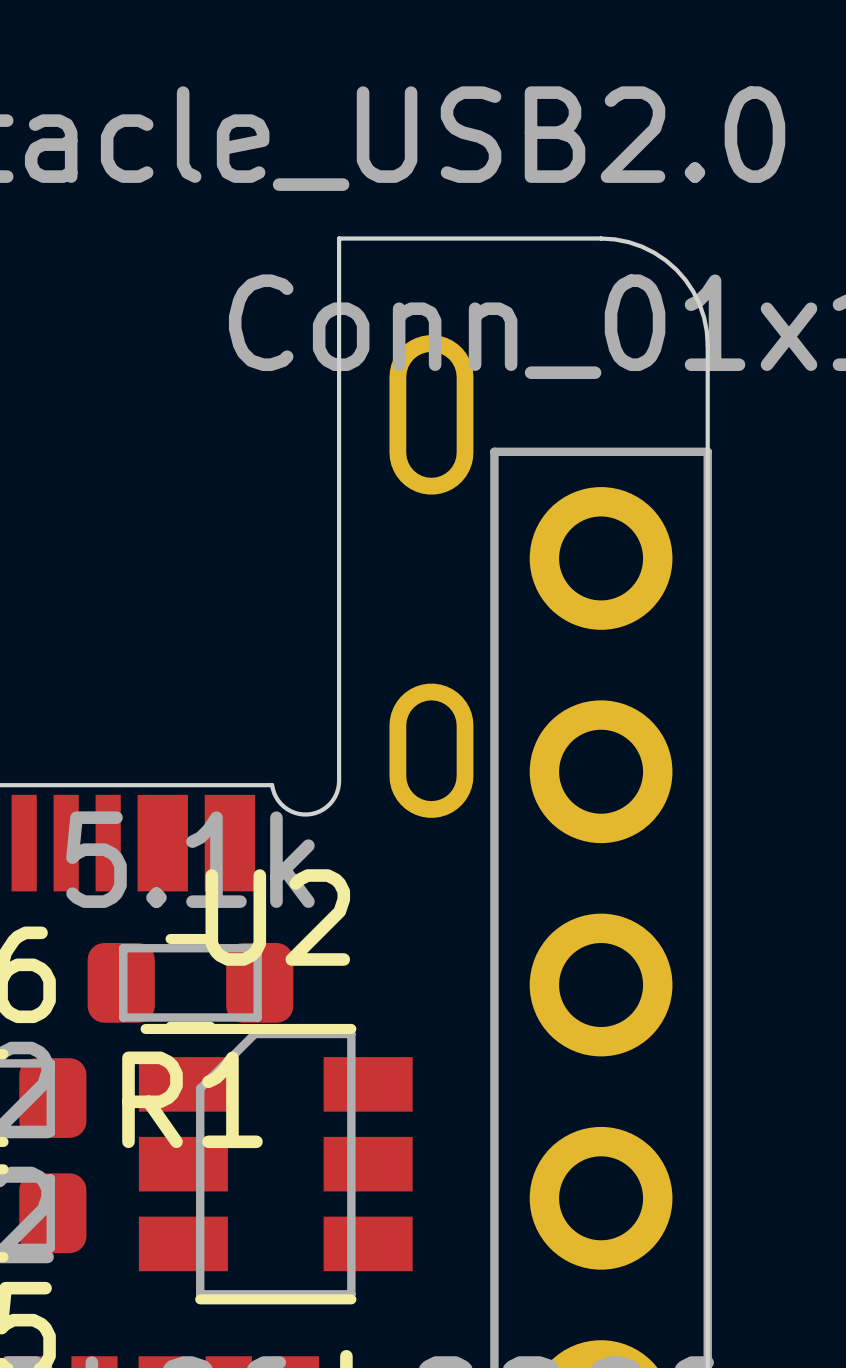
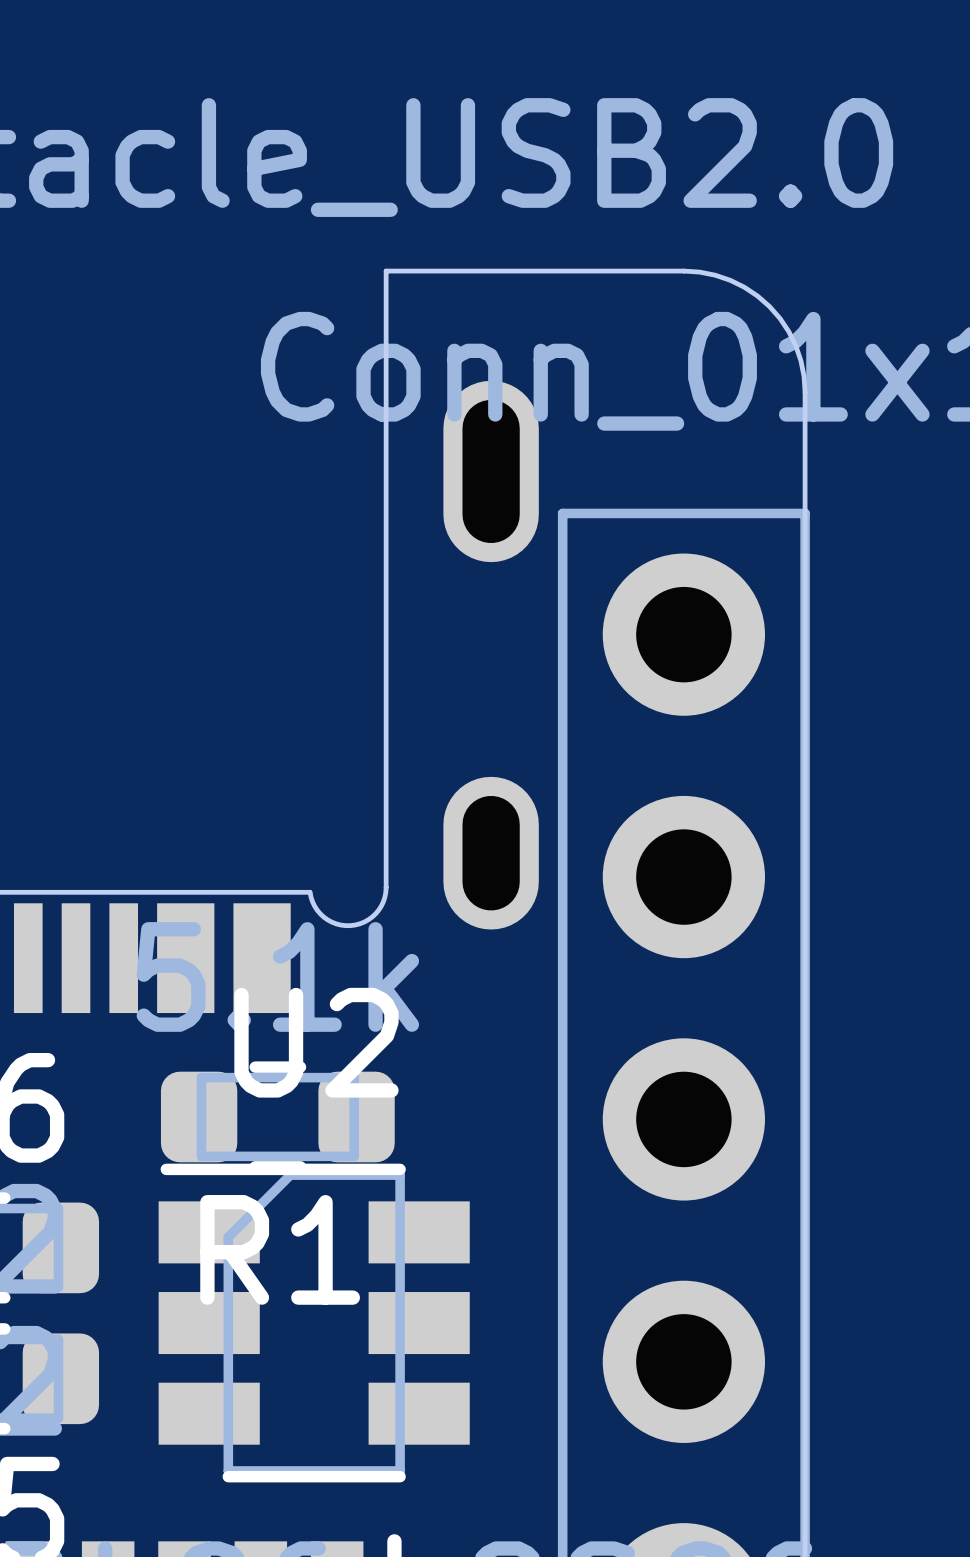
R1 position: (190, 982) -> (277, 1117)

